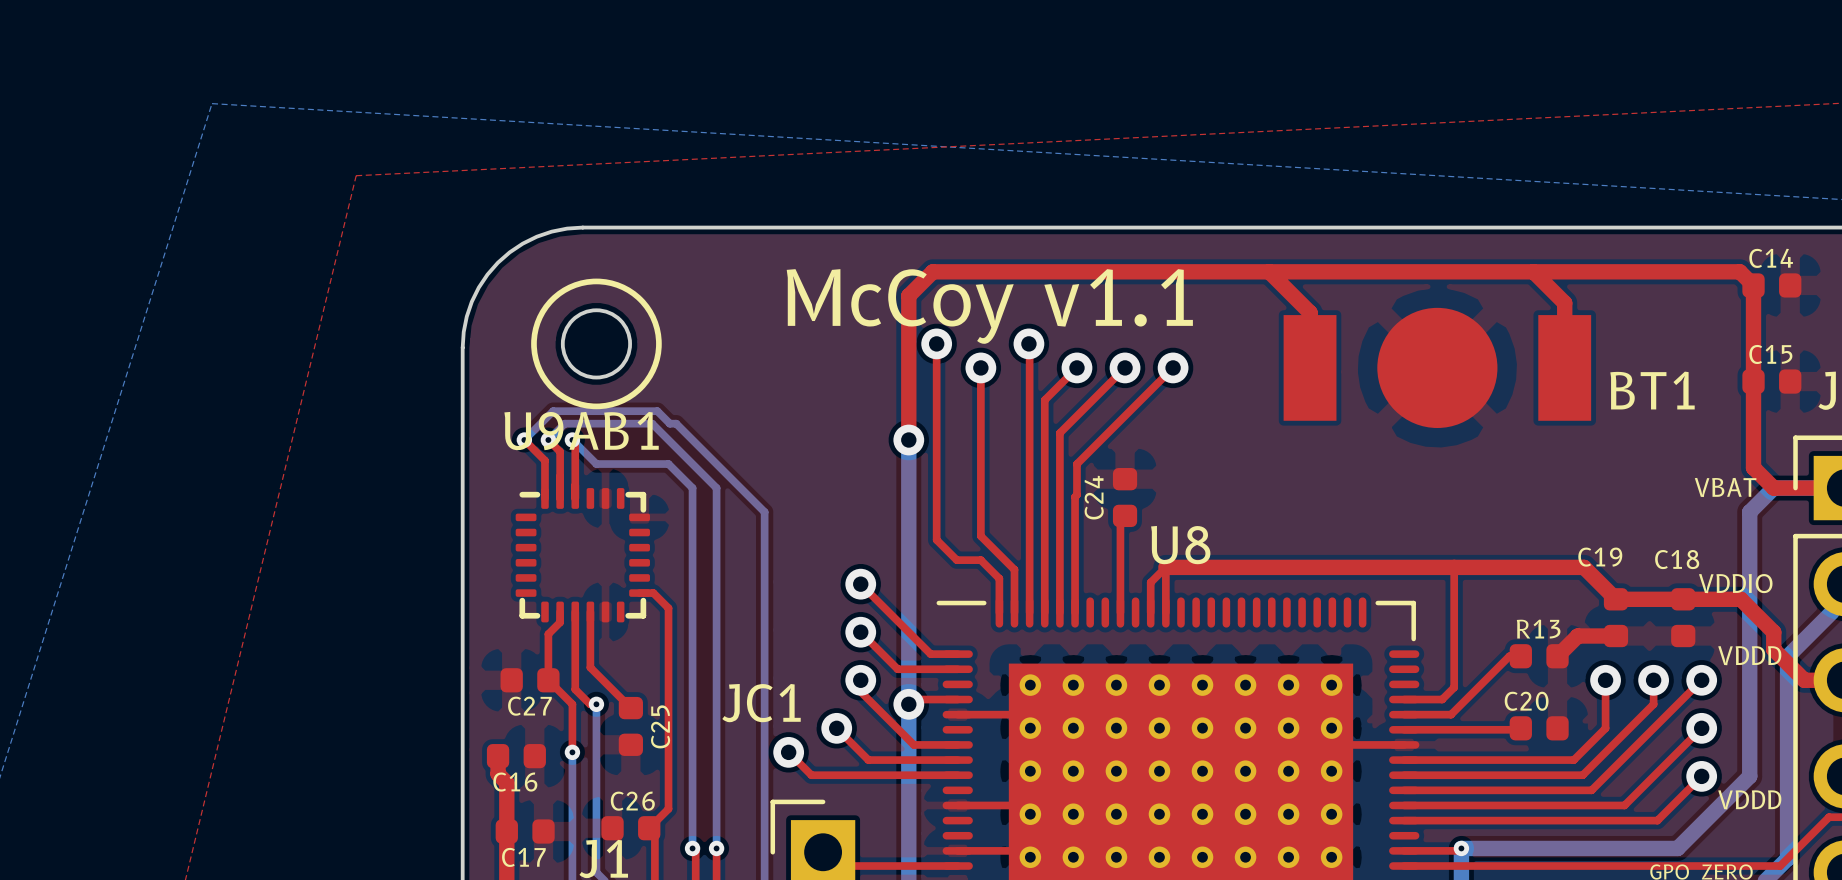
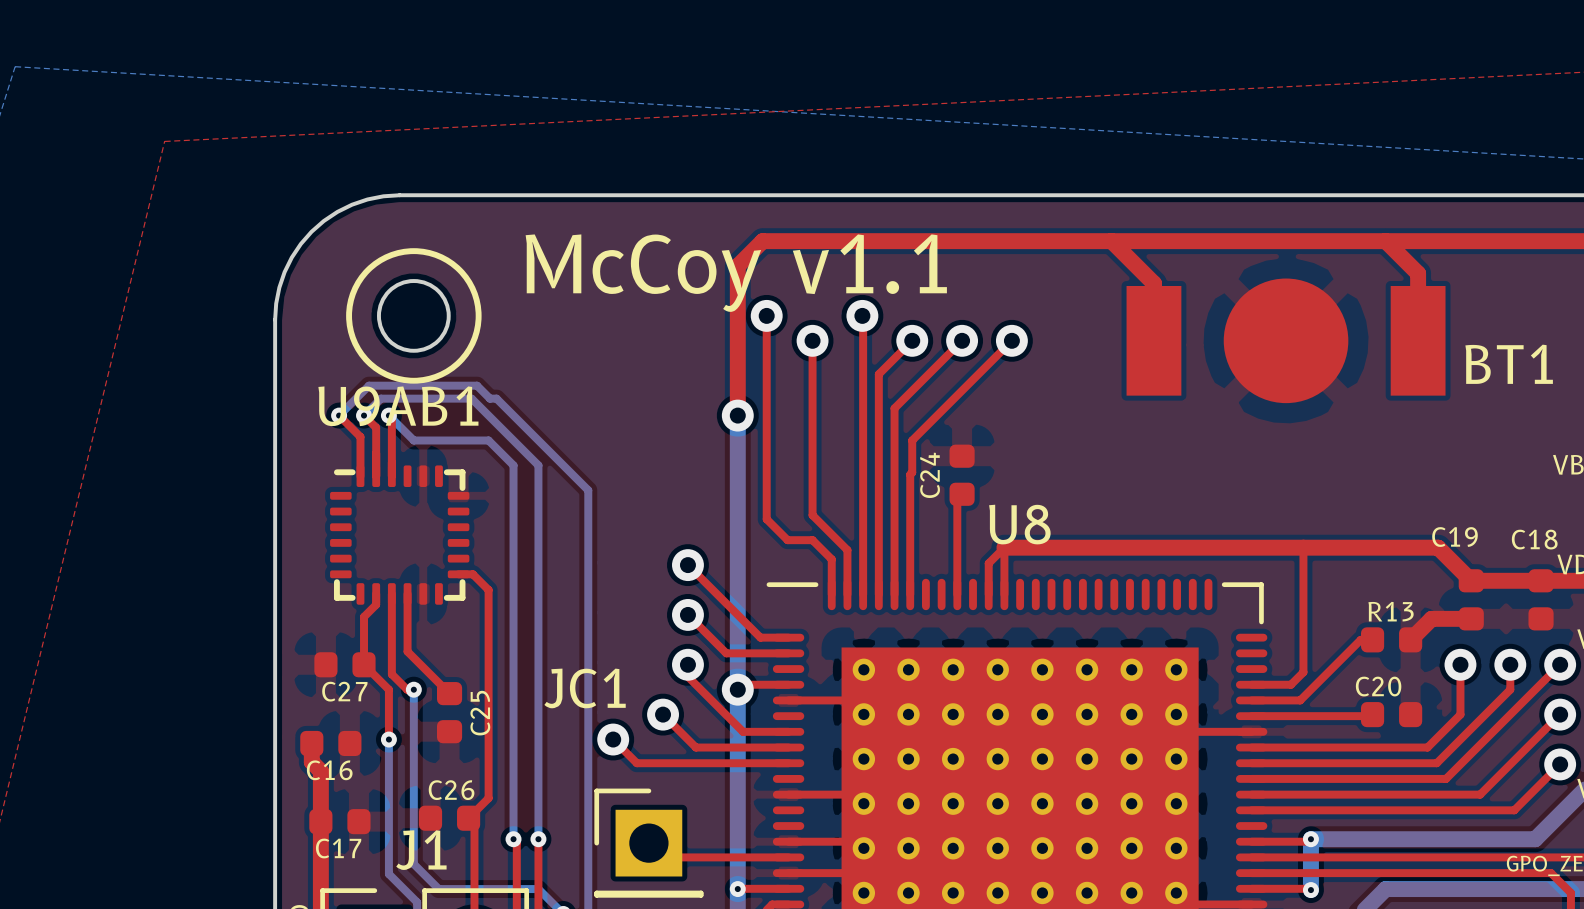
text position: McCoy v1.1 (989, 306) -> McCoy v1.1 (736, 273)

